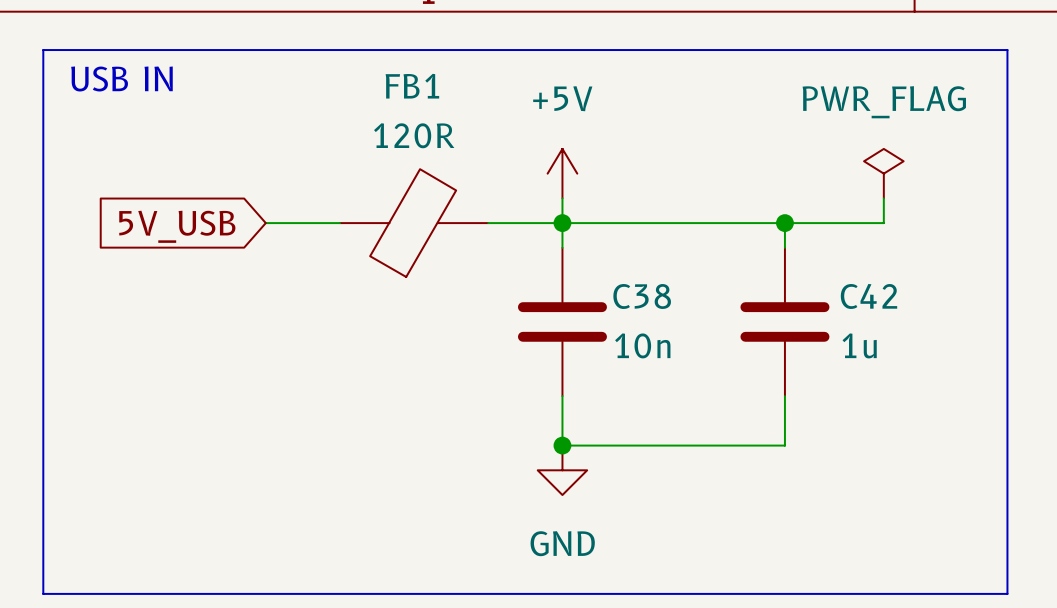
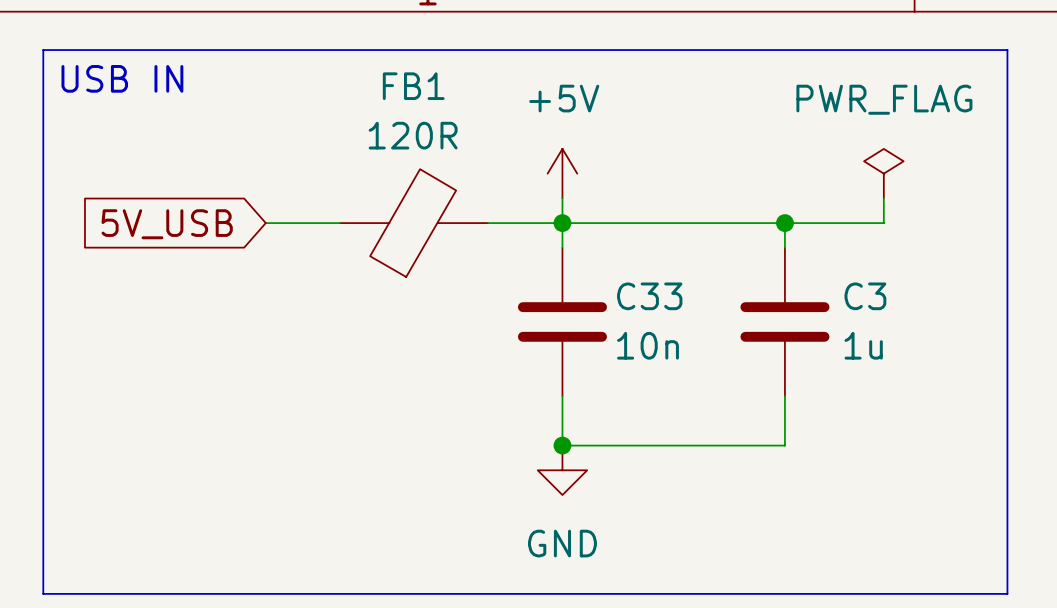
C38 name: C38 (642, 296) -> C33 (649, 296)
C42 name: C42 (868, 296) -> C3 (865, 296)

